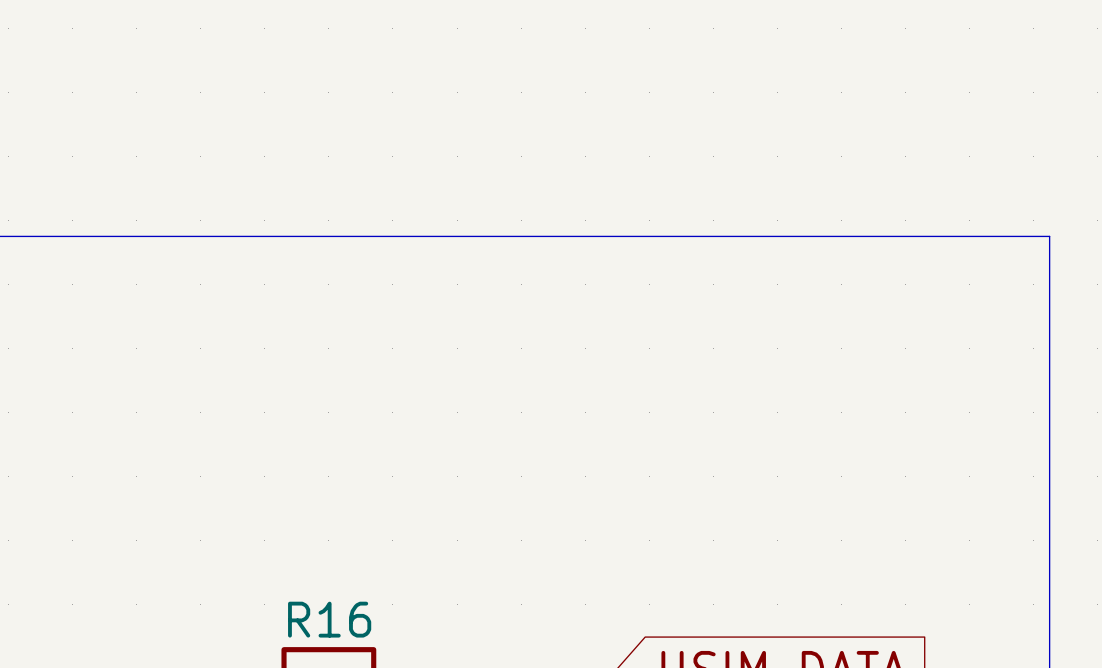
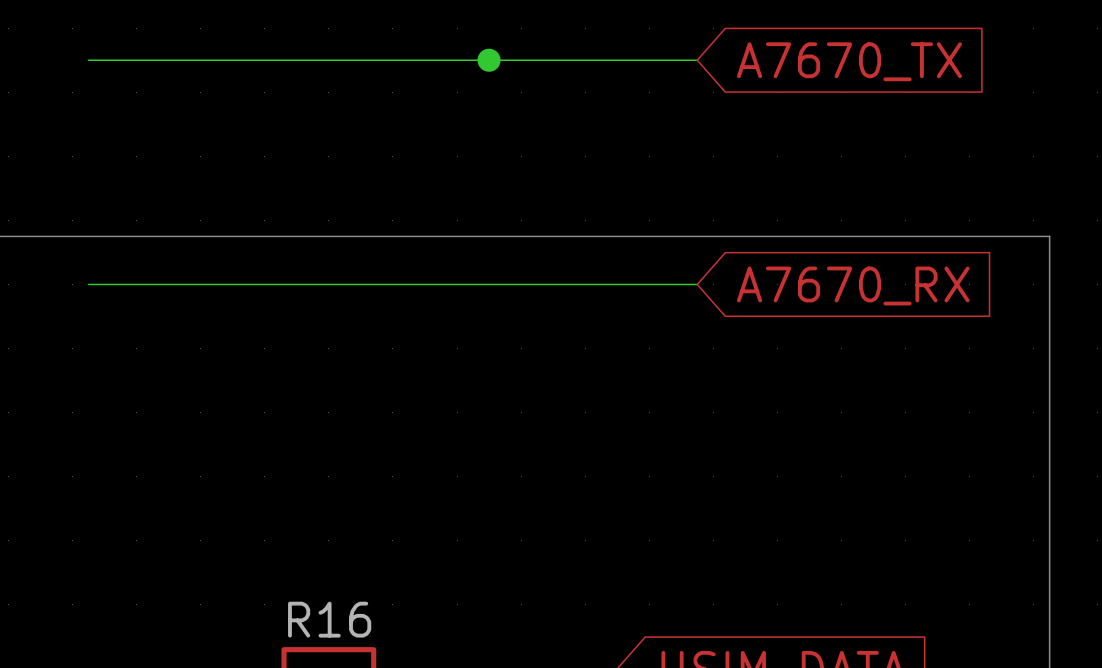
wire: none -> (88, 60) (697, 60)
junction: none -> (489, 60)
global label: none -> A7670_TX (849, 61)
wire: none -> (88, 284) (697, 284)
global label: none -> A7670_RX (853, 285)

